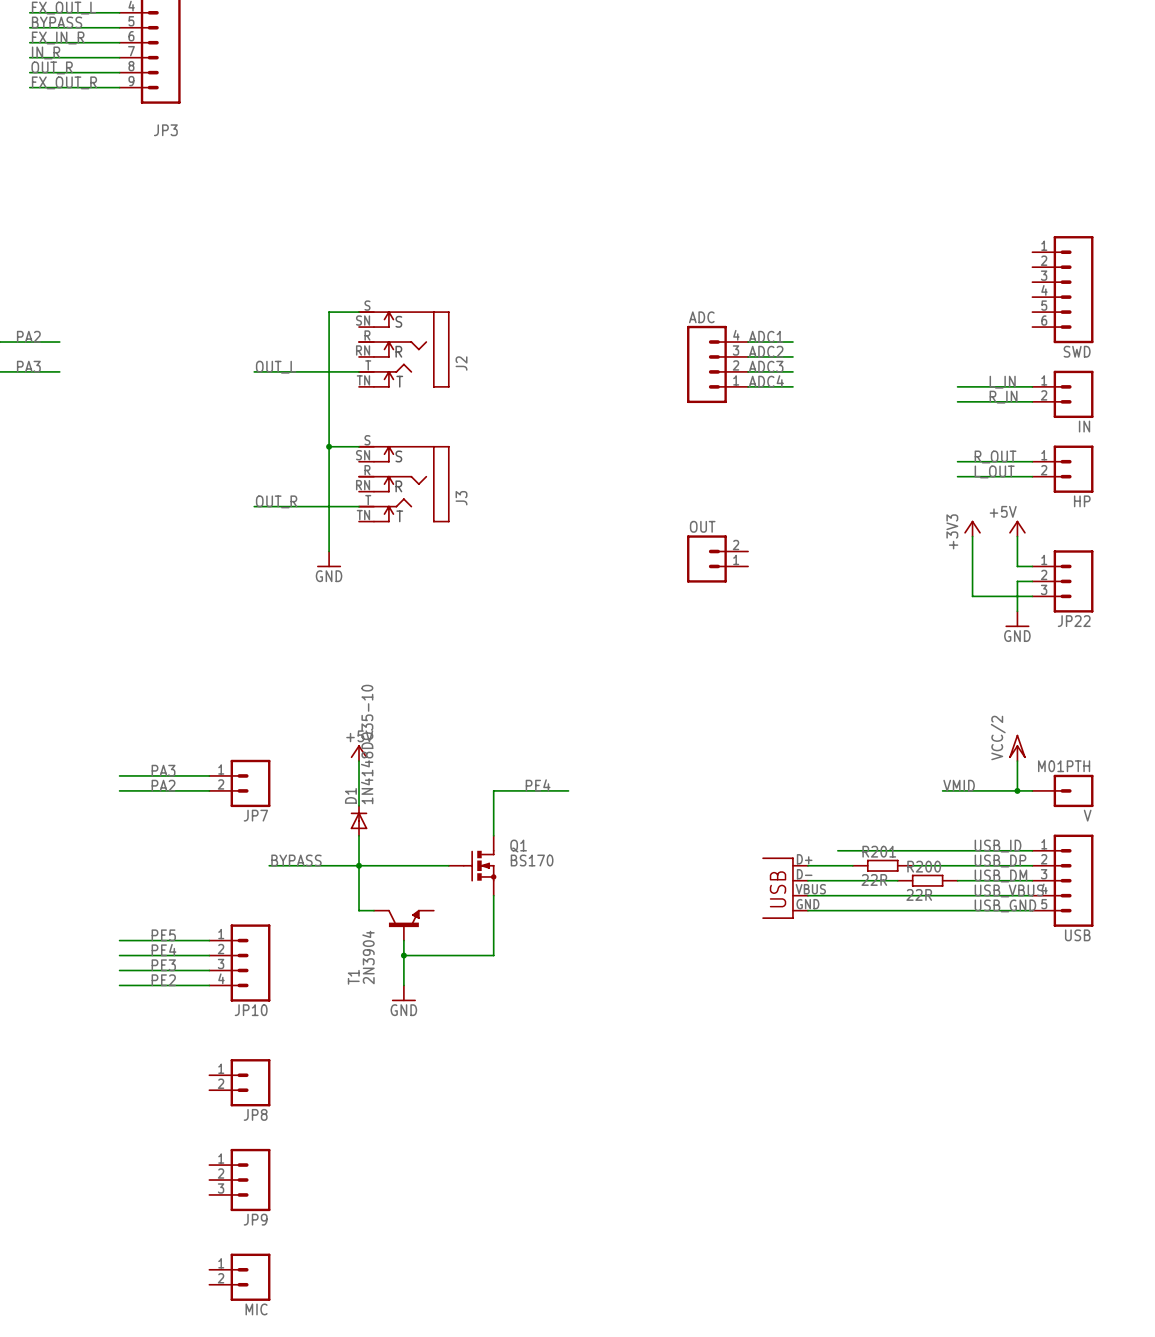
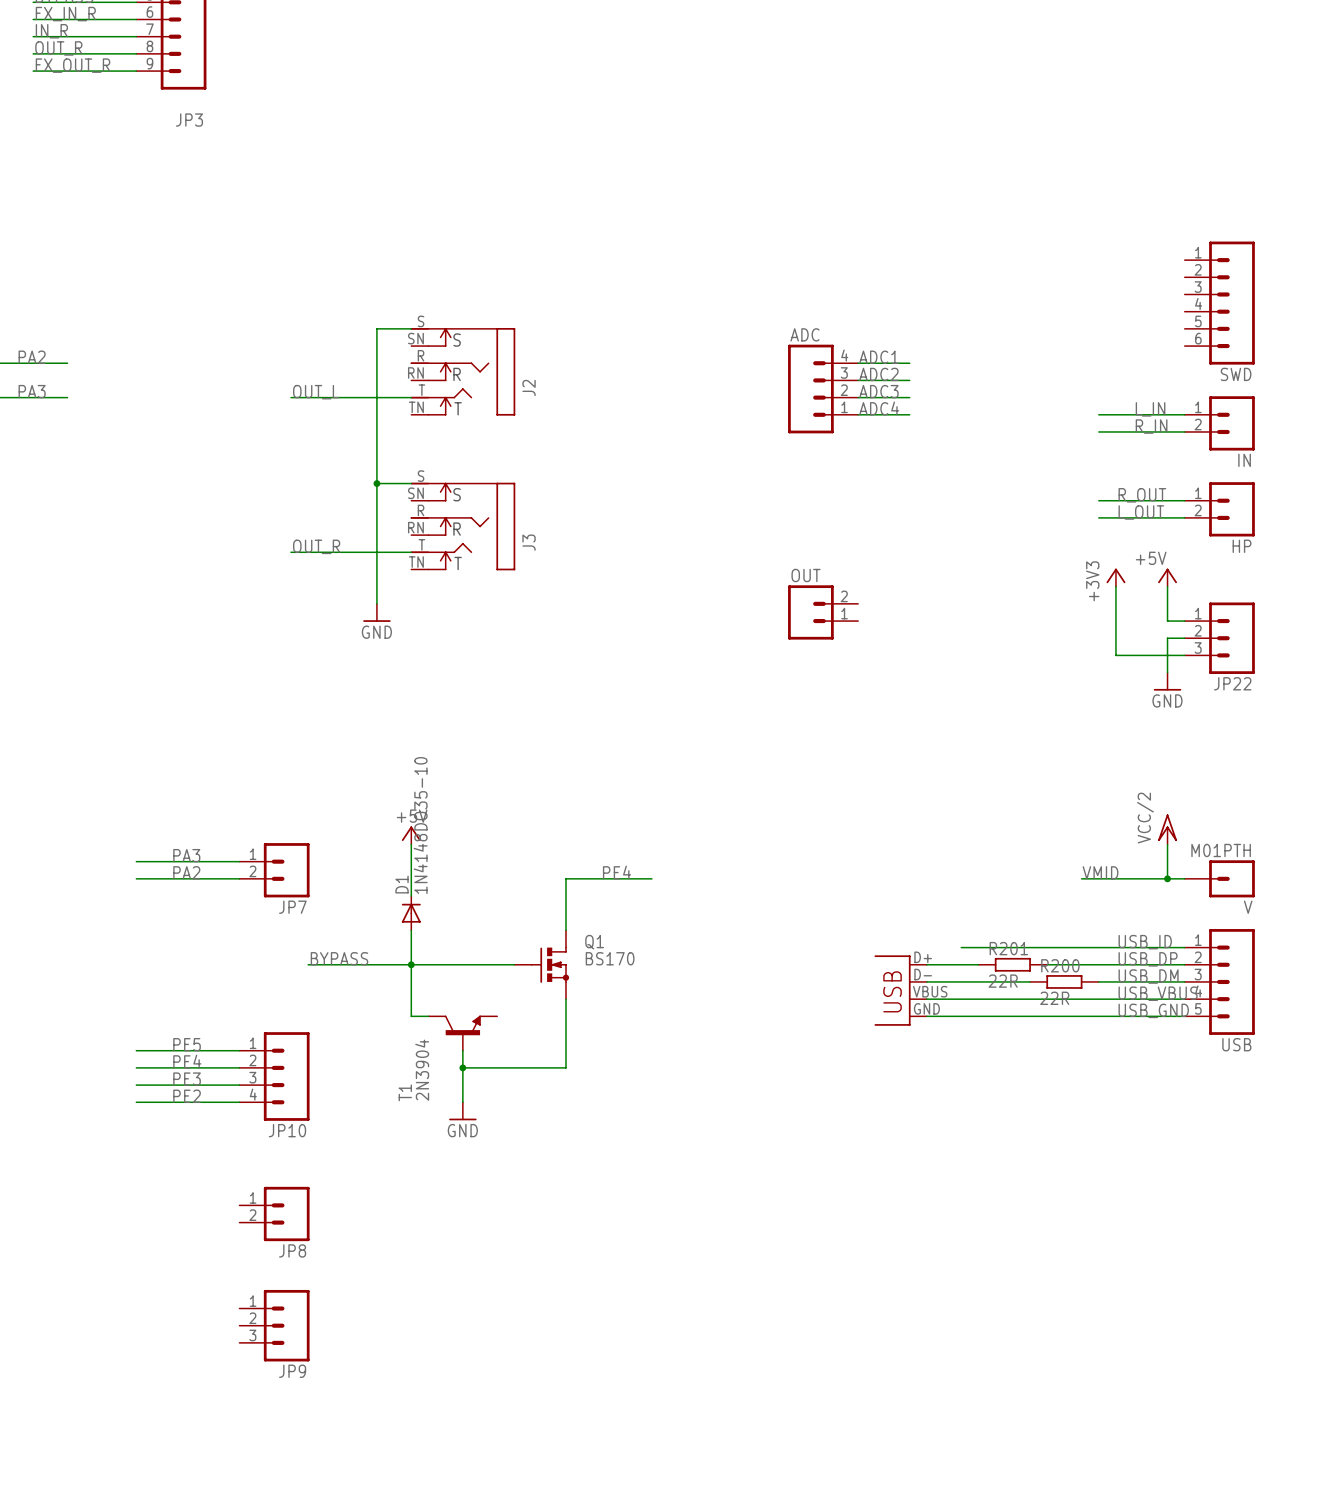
MIC: (239, 1277) -> none

